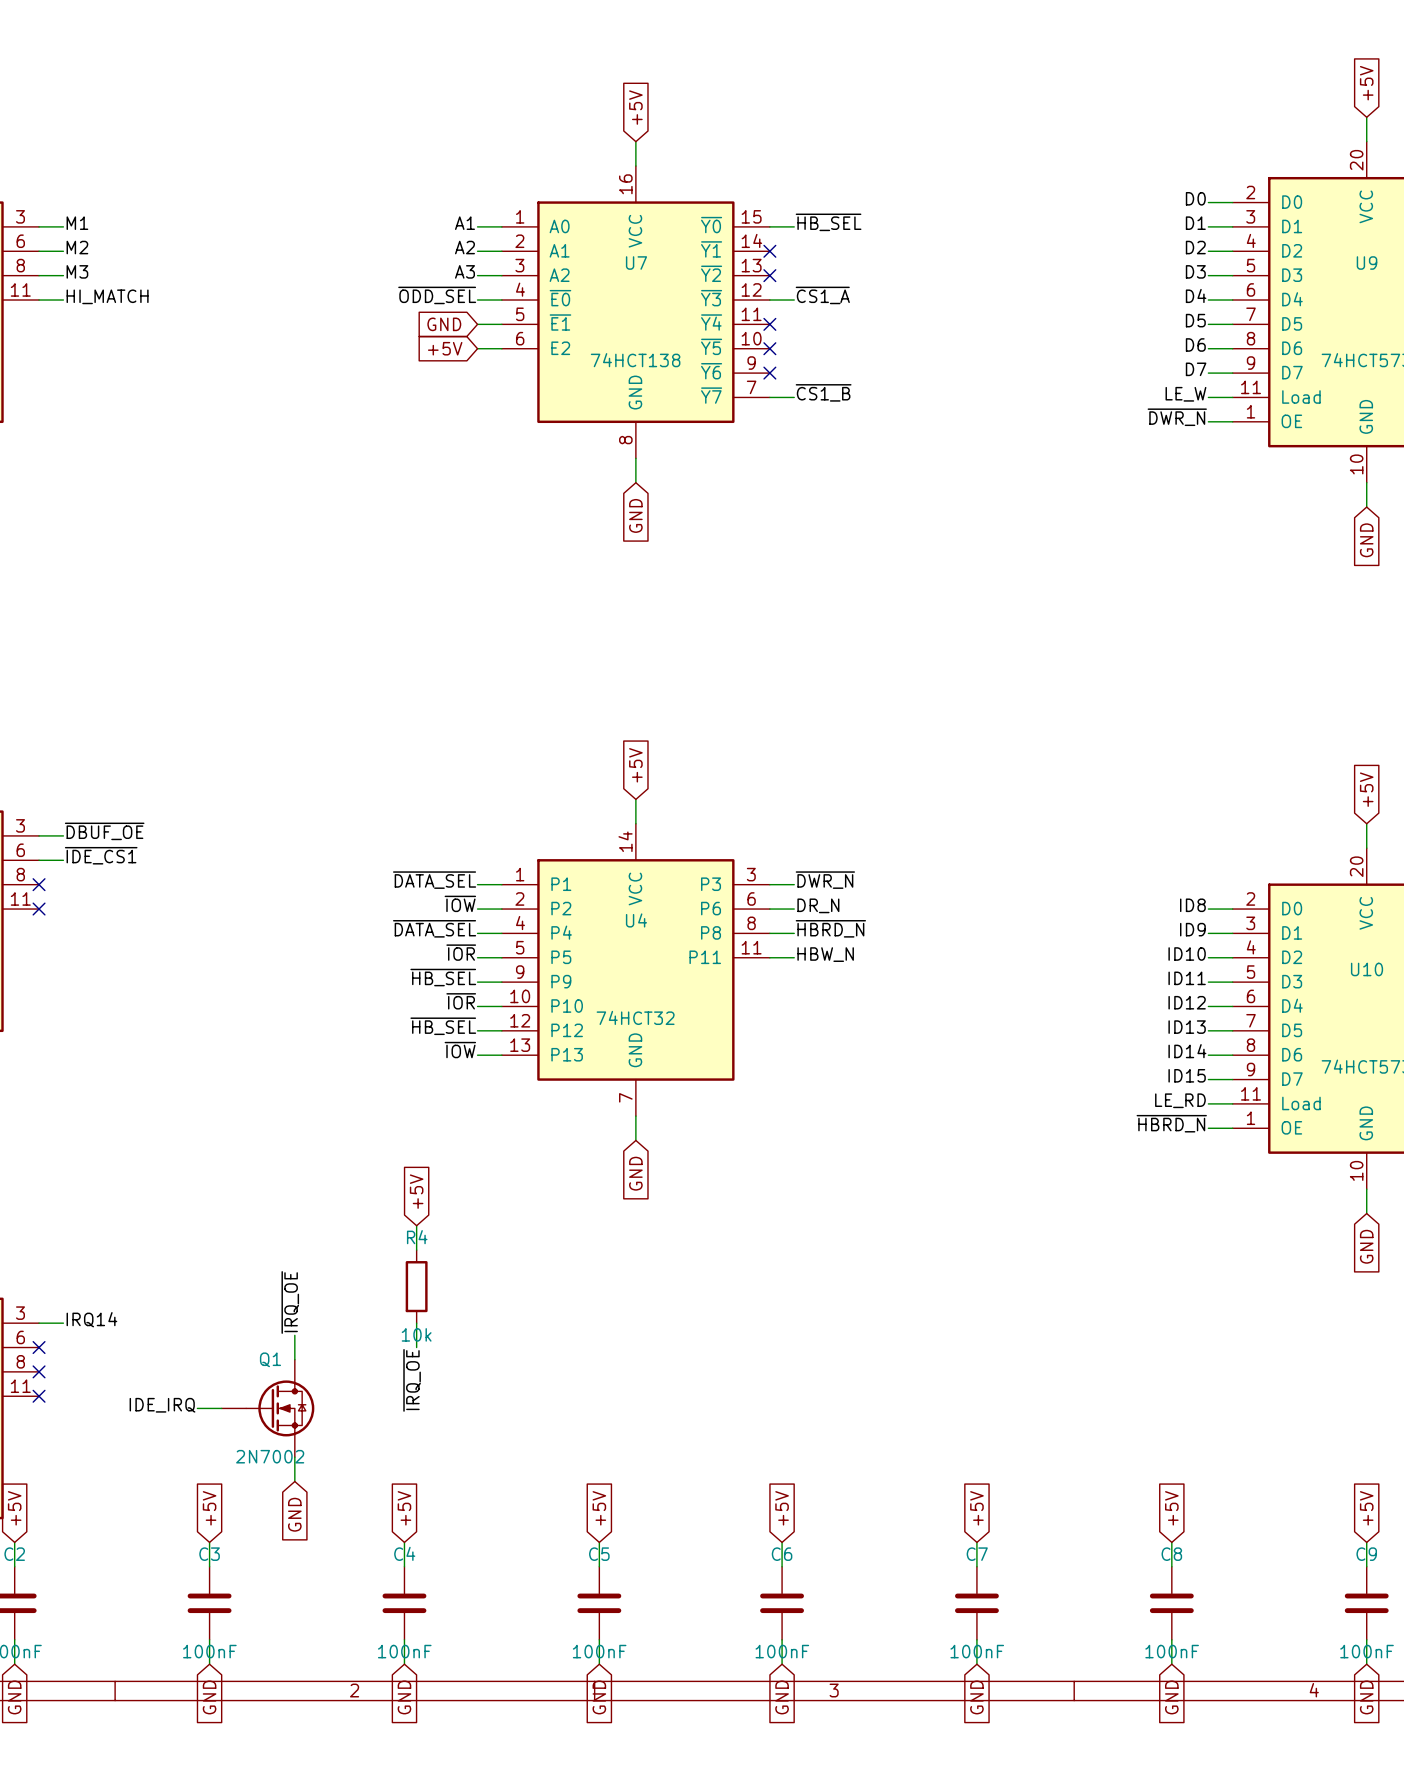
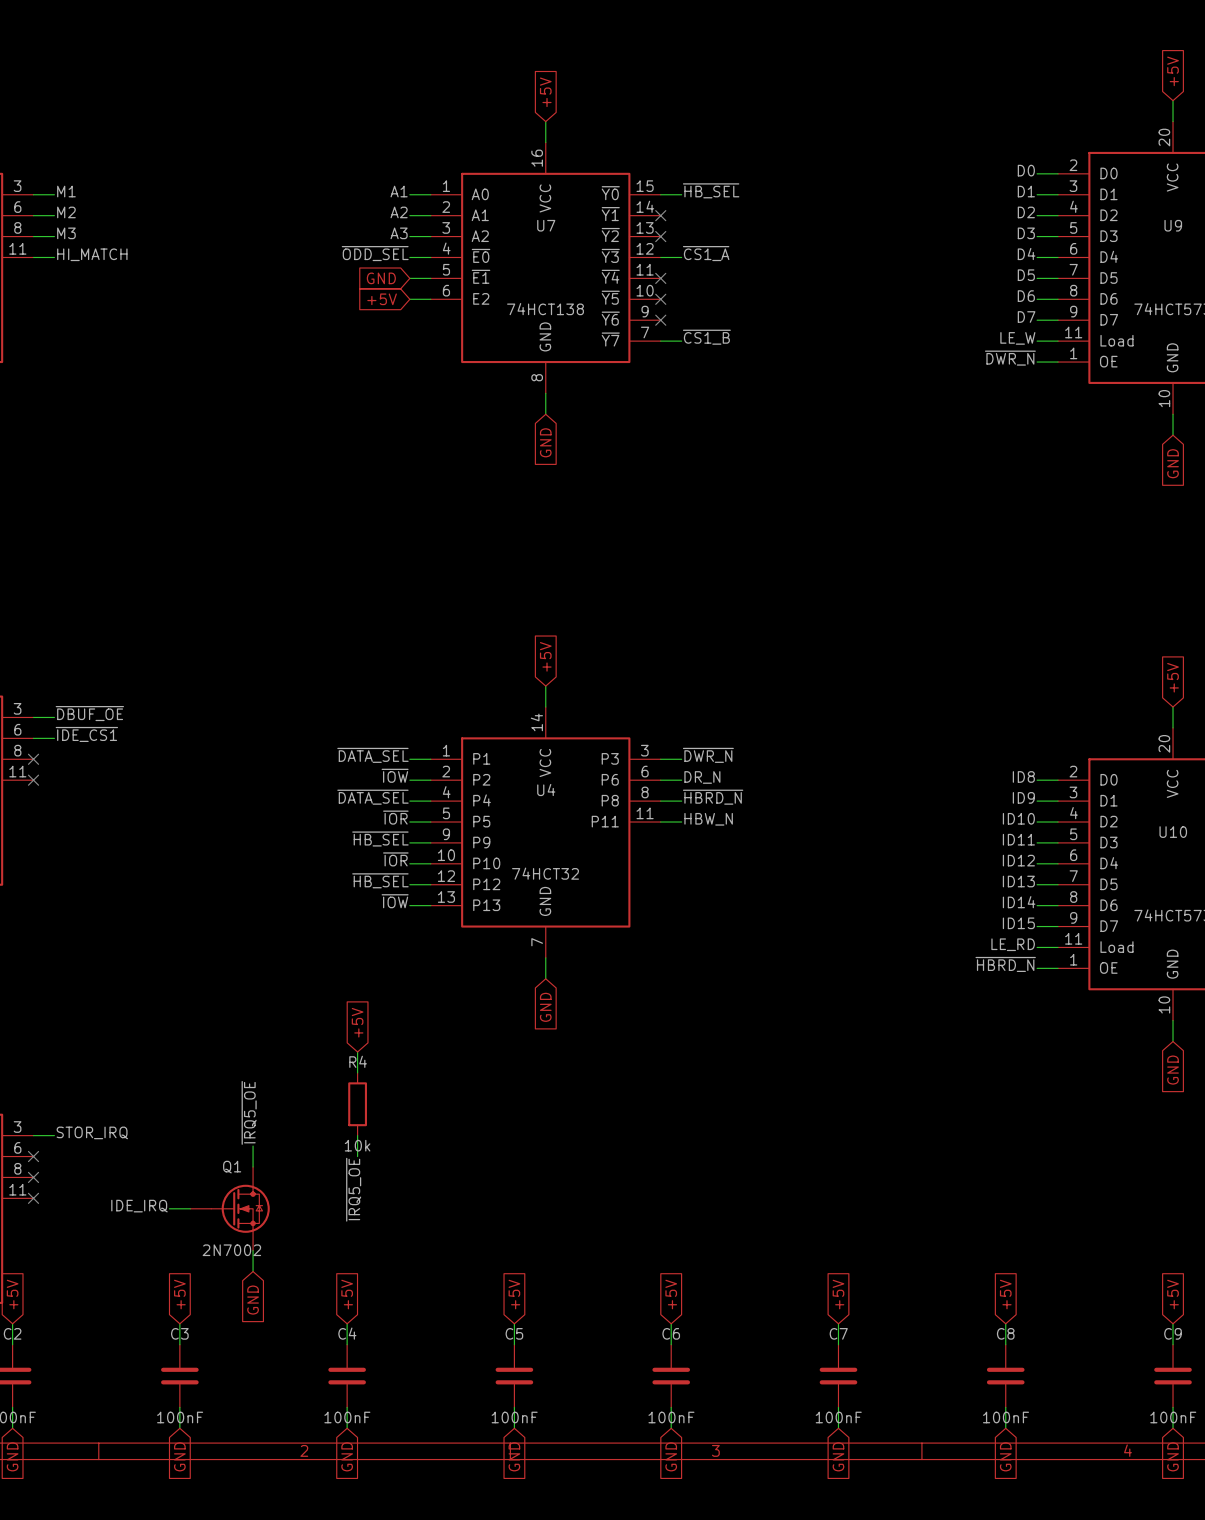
label: ~{IRQ_OE} (290, 1302) -> ~{IRQ5_OE} (249, 1112)
label: IRQ14 (91, 1319) -> STOR_IRQ (92, 1132)
label: ~{IRQ_OE} (412, 1380) -> ~{IRQ5_OE} (353, 1189)

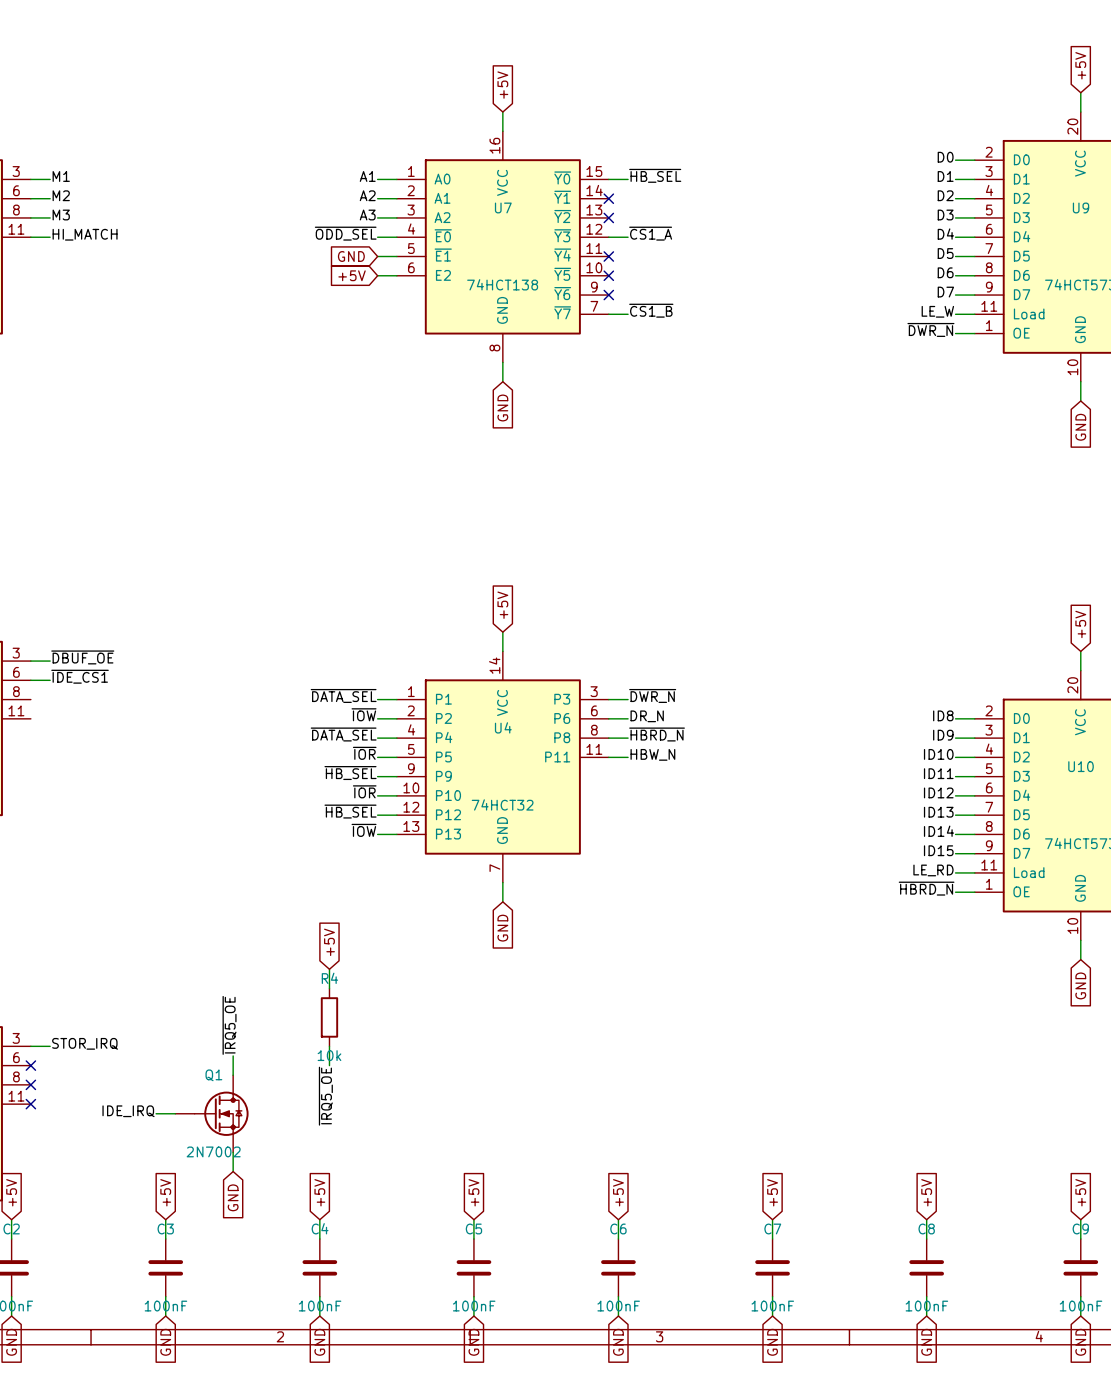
no-connect mark: (33, 759) -> none
no-connect mark: (33, 780) -> none

